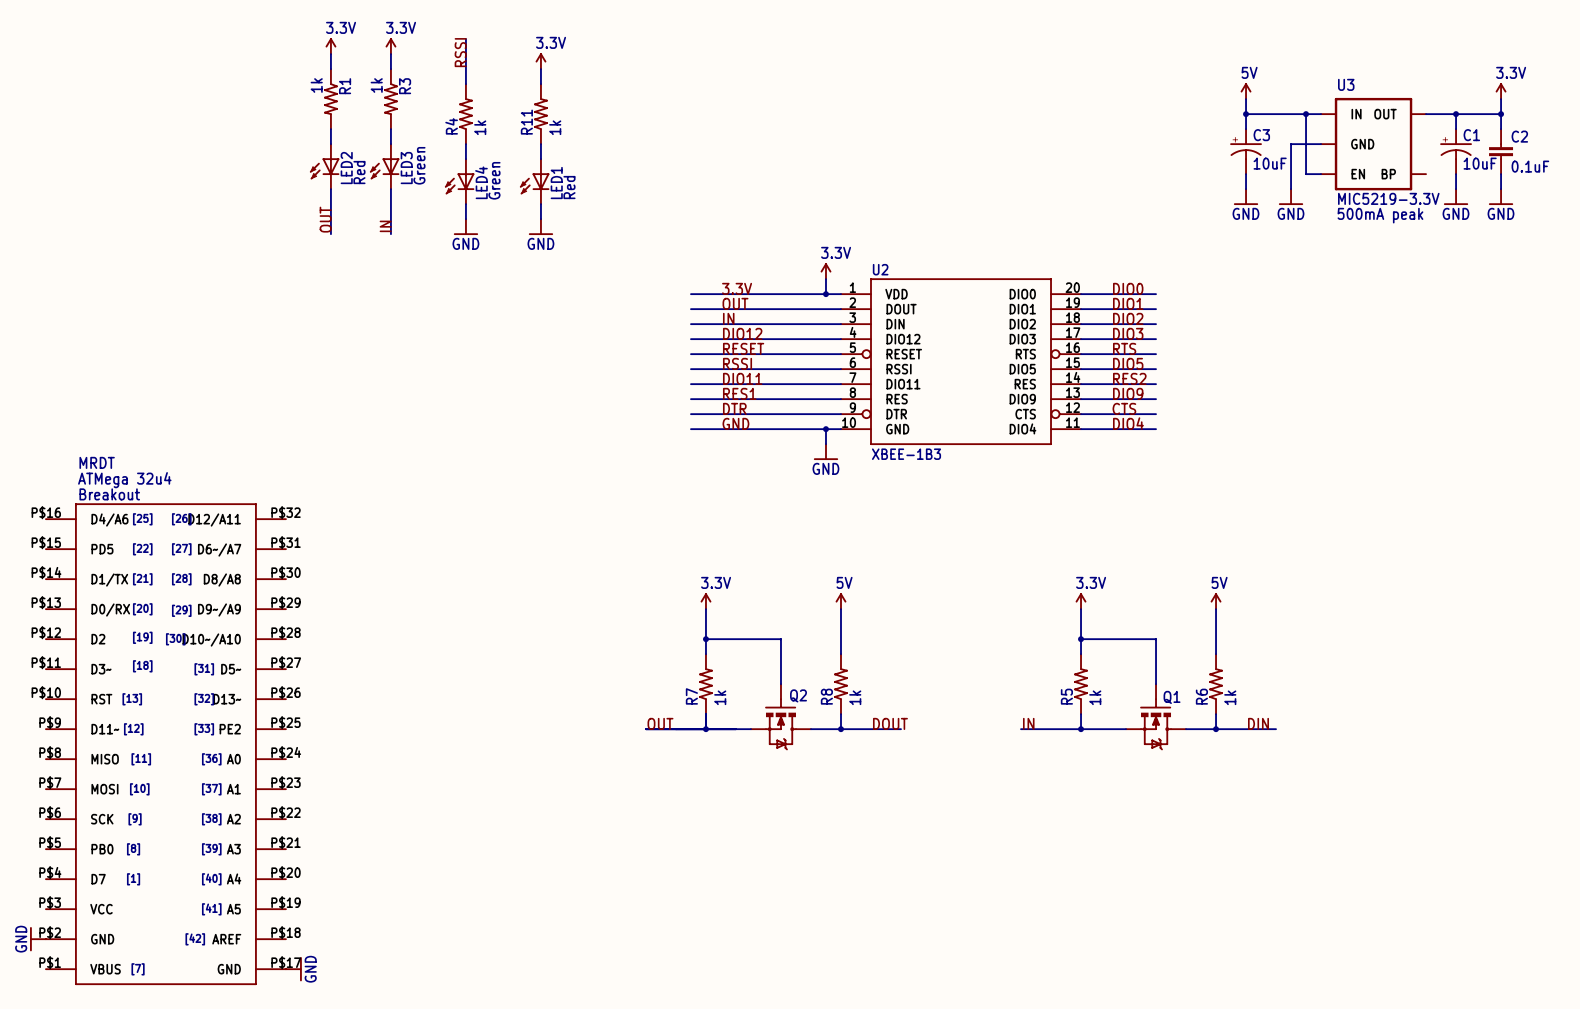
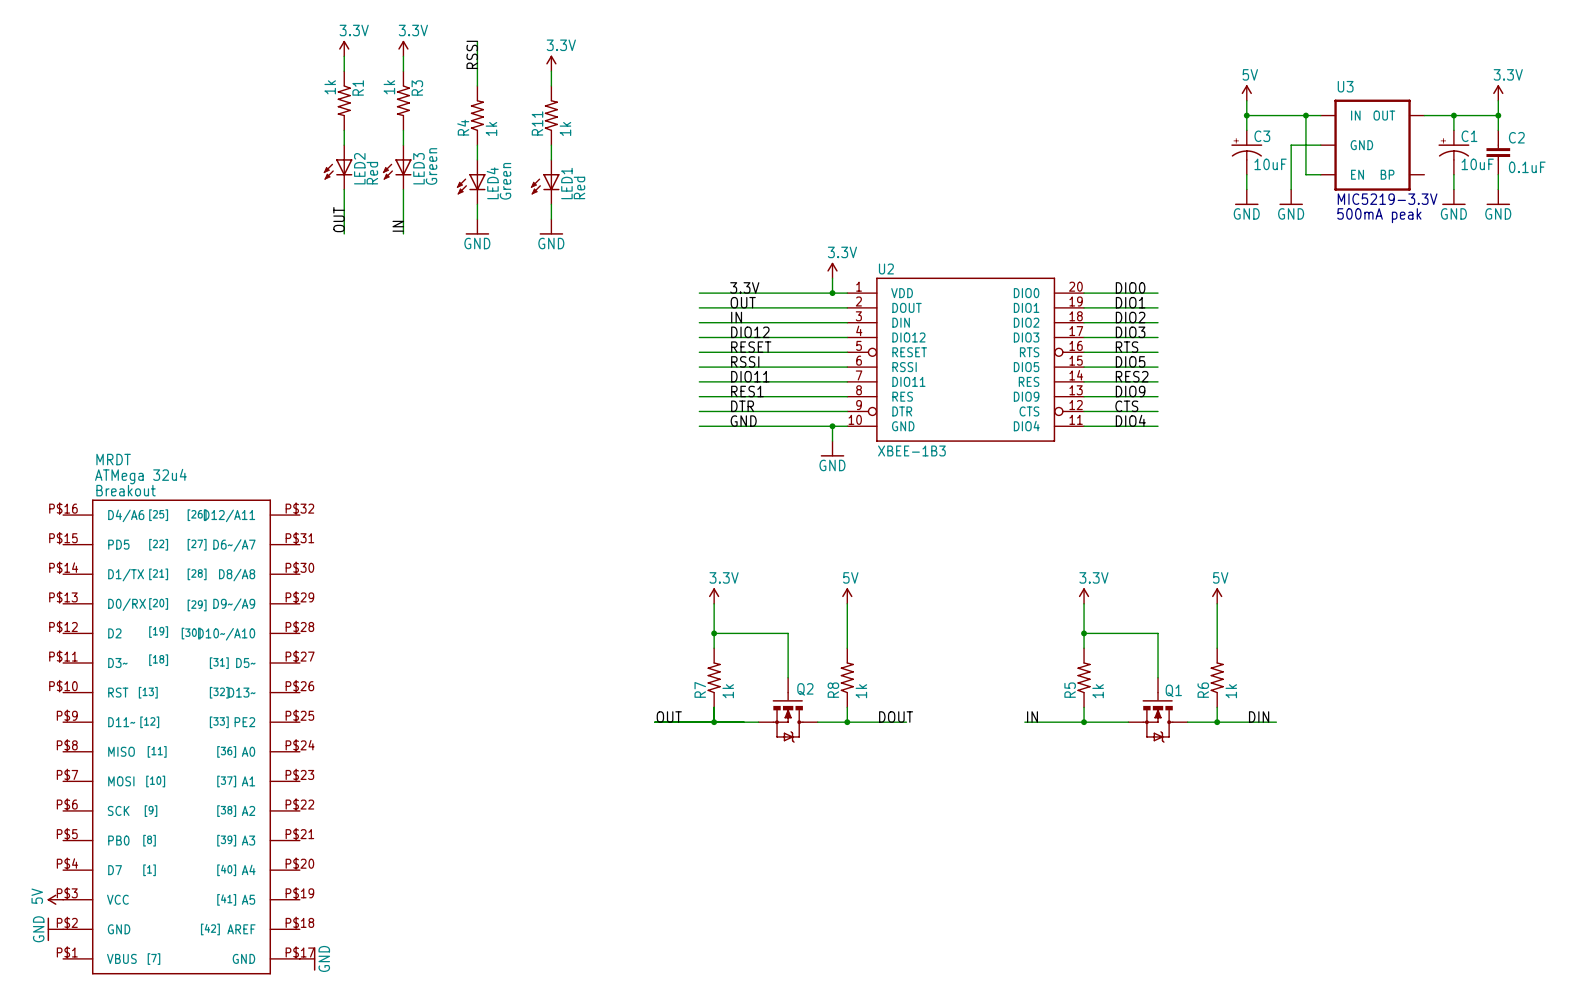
power symbol: none -> 5V (55, 899)

